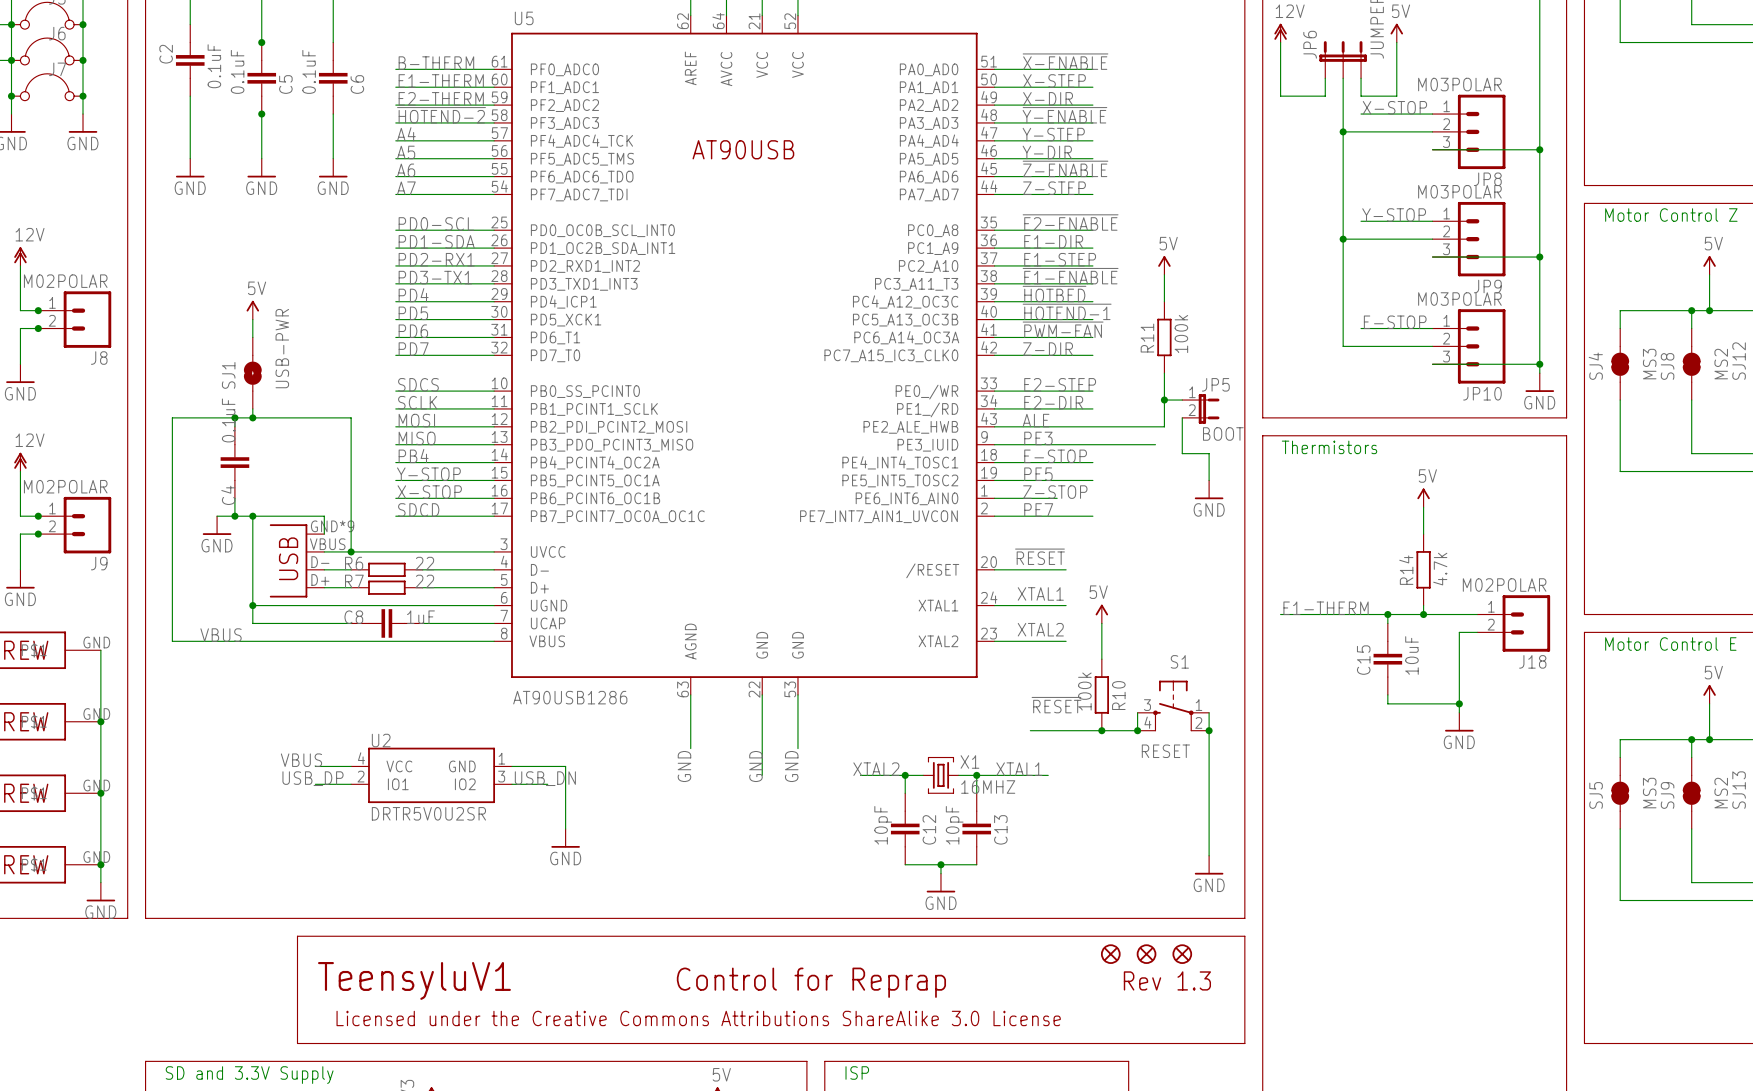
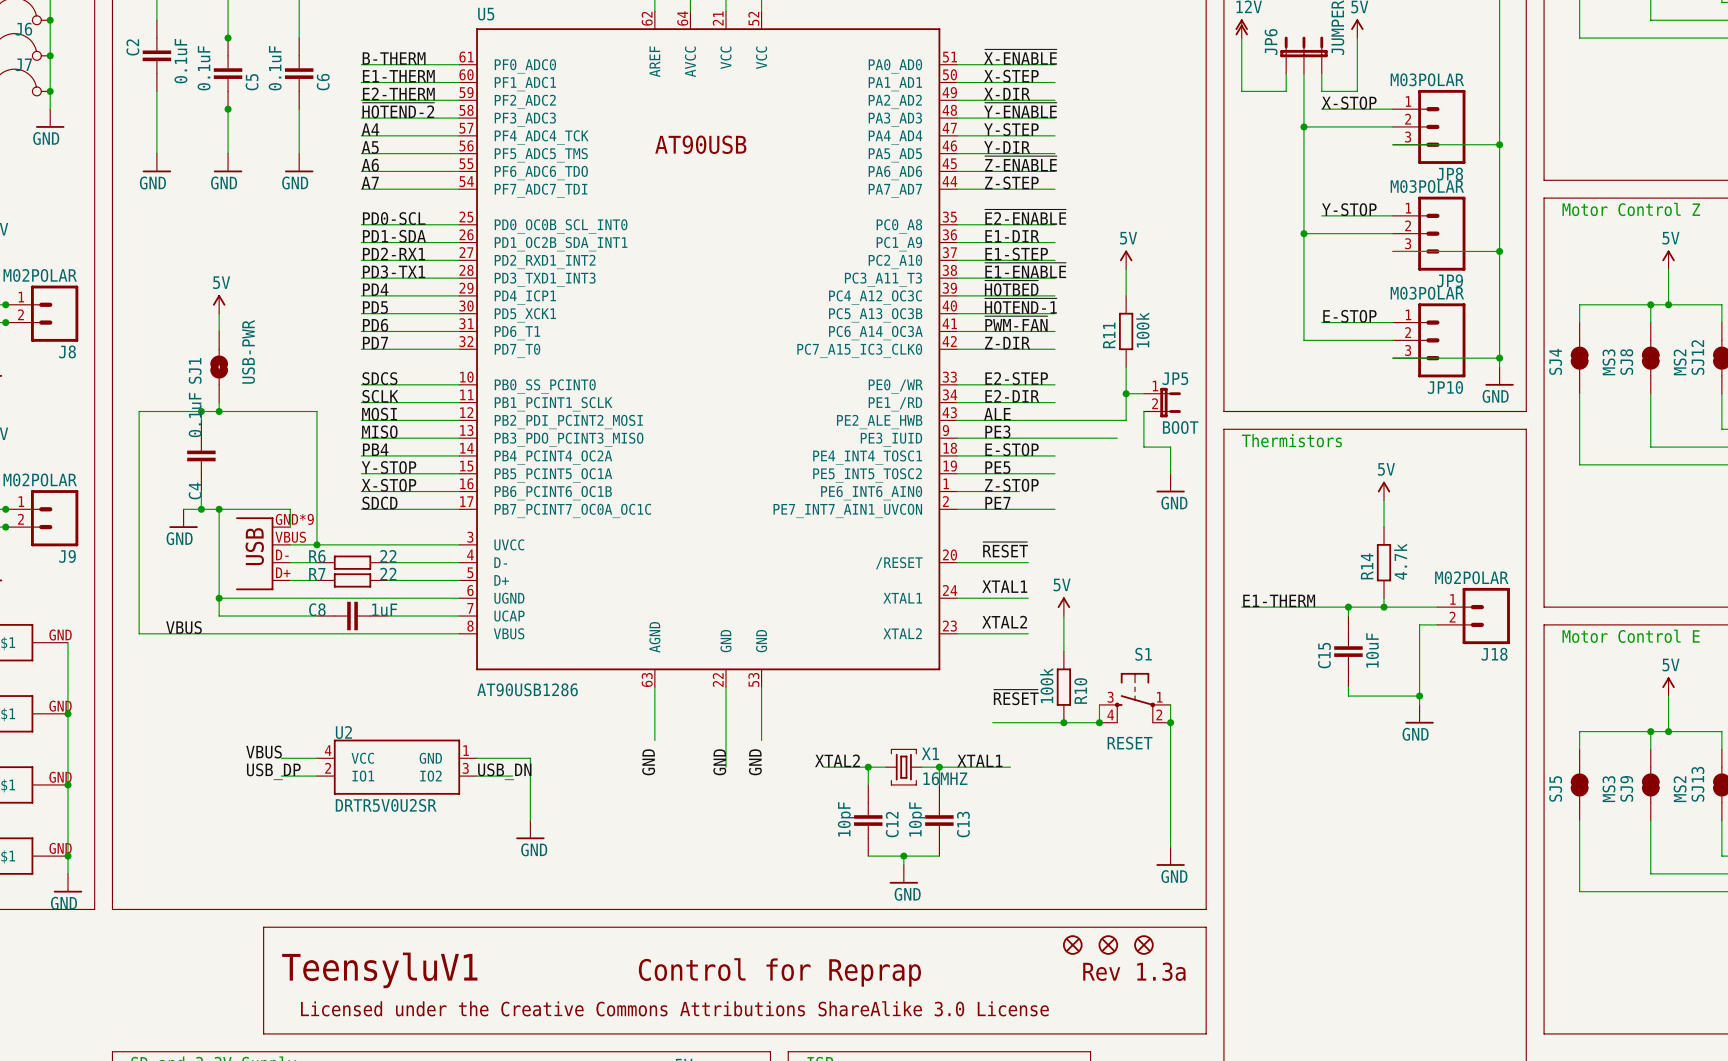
text: Rev 1.3 (1167, 980) -> Rev 1.3a (1134, 971)

